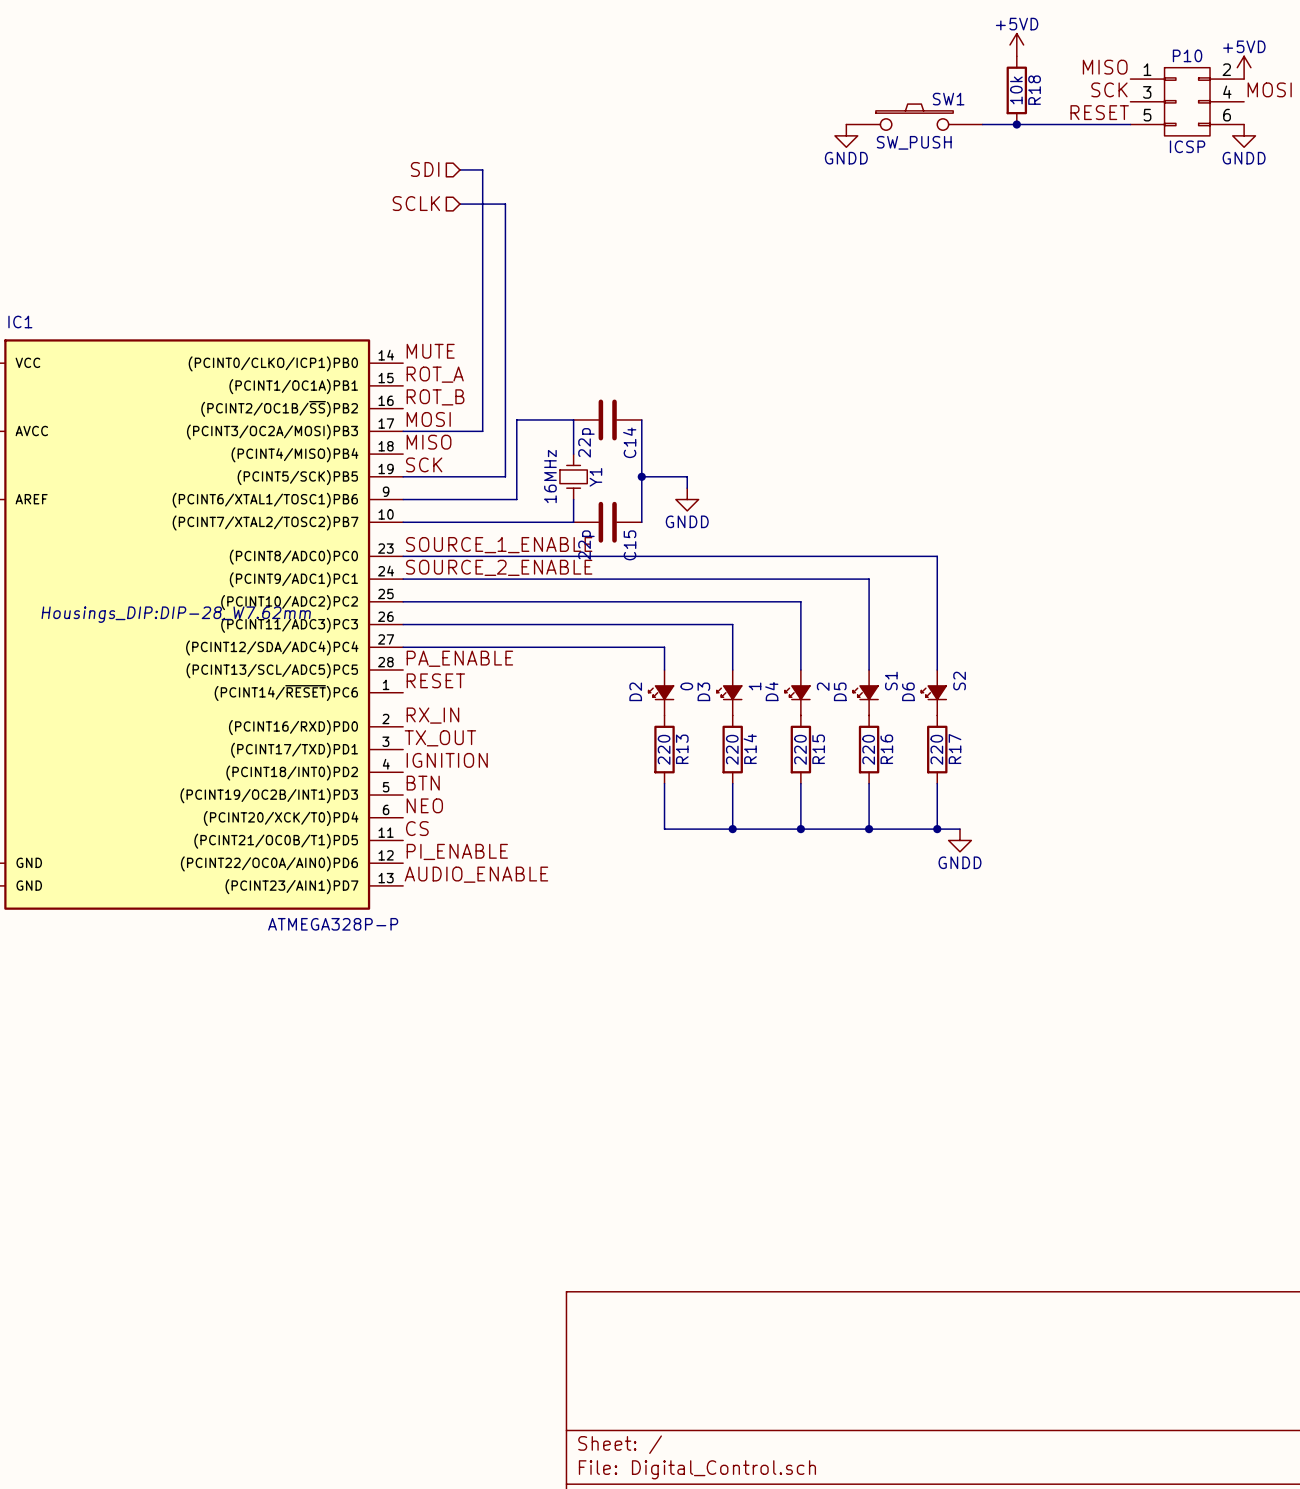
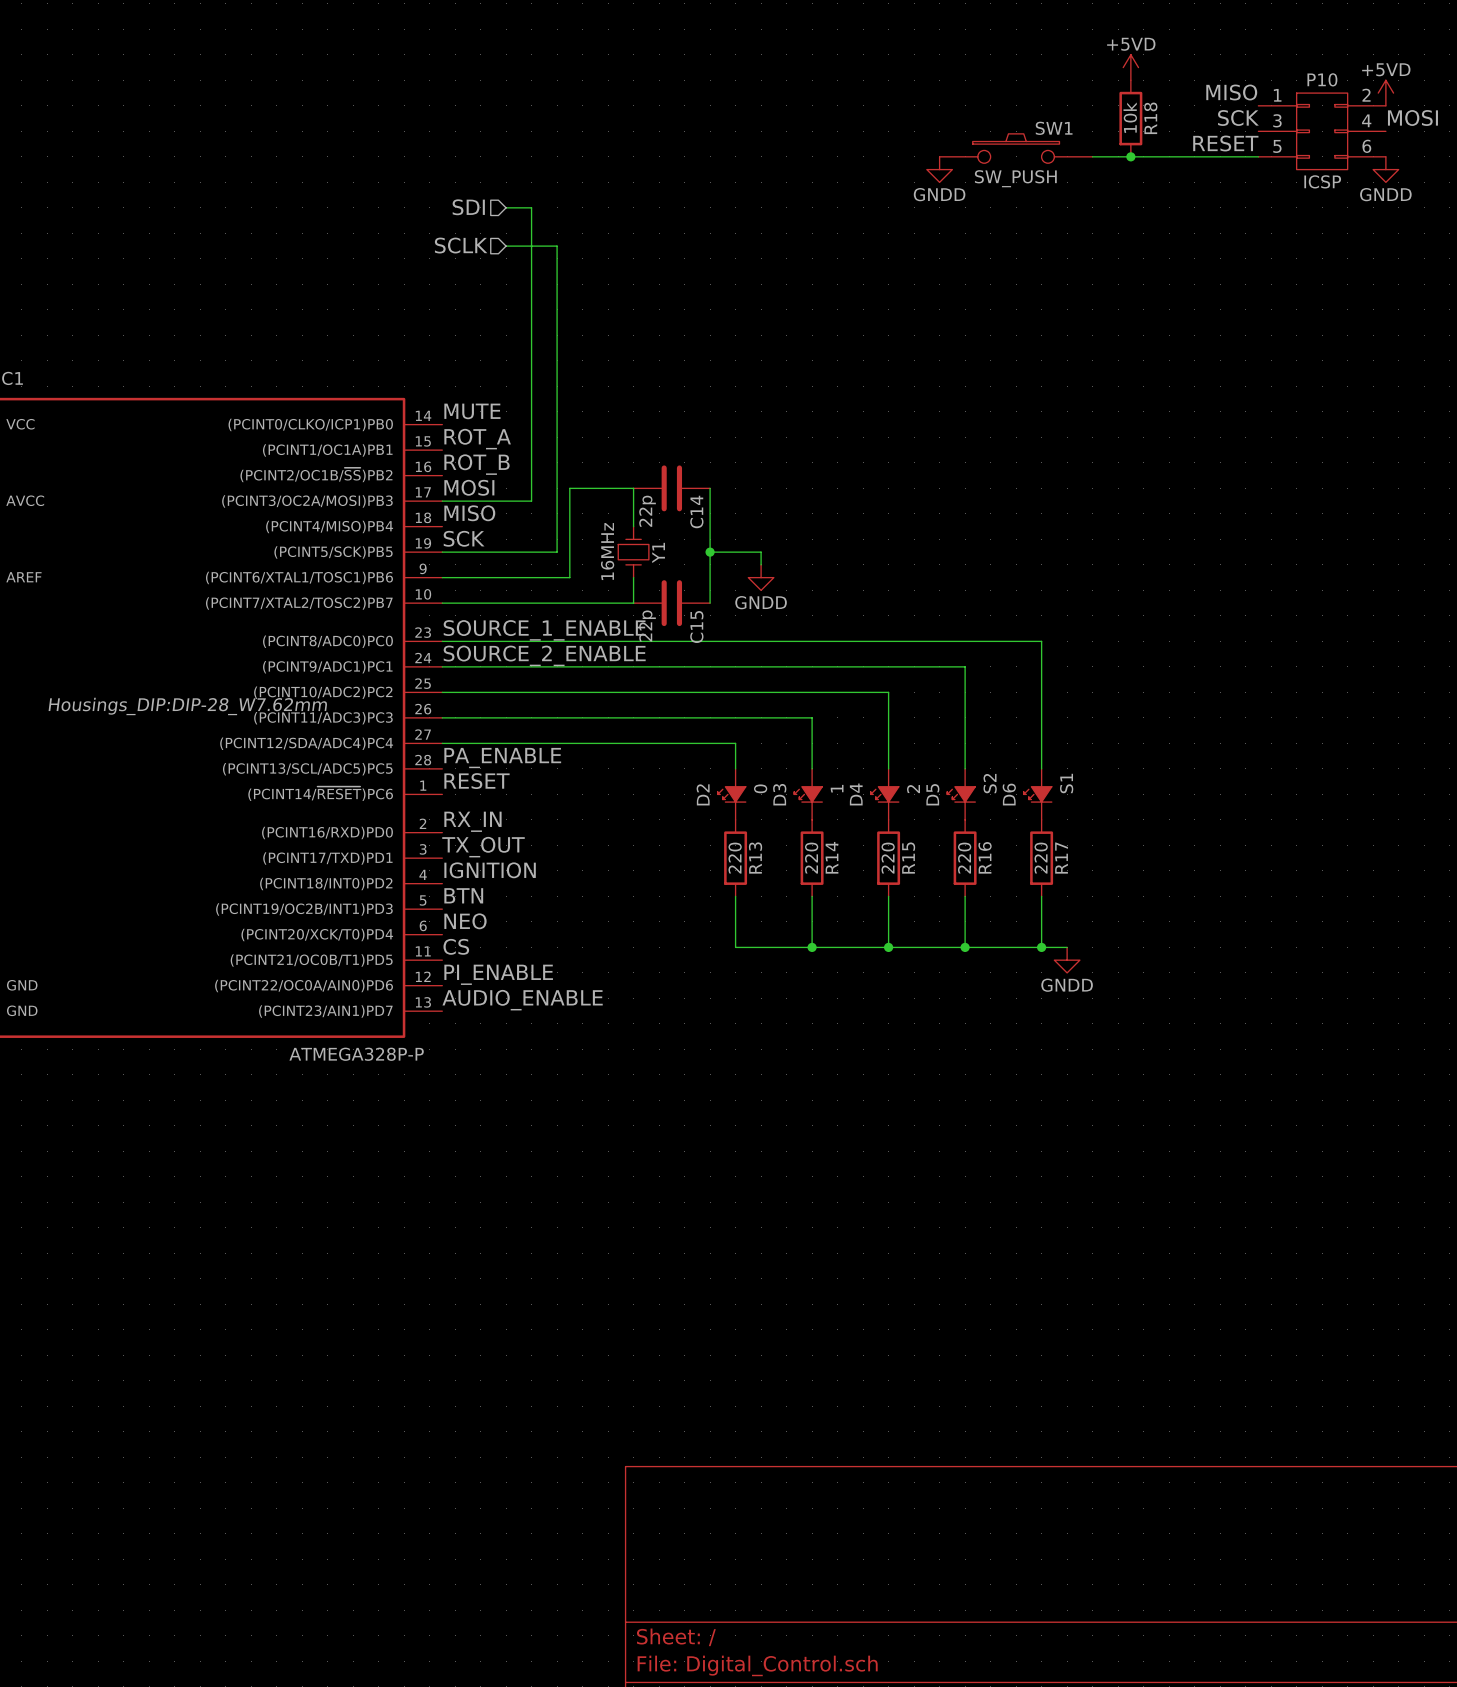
D5 value: S1 (891, 681) -> S2 (990, 783)
D6 value: S2 (959, 681) -> S1 (1066, 783)

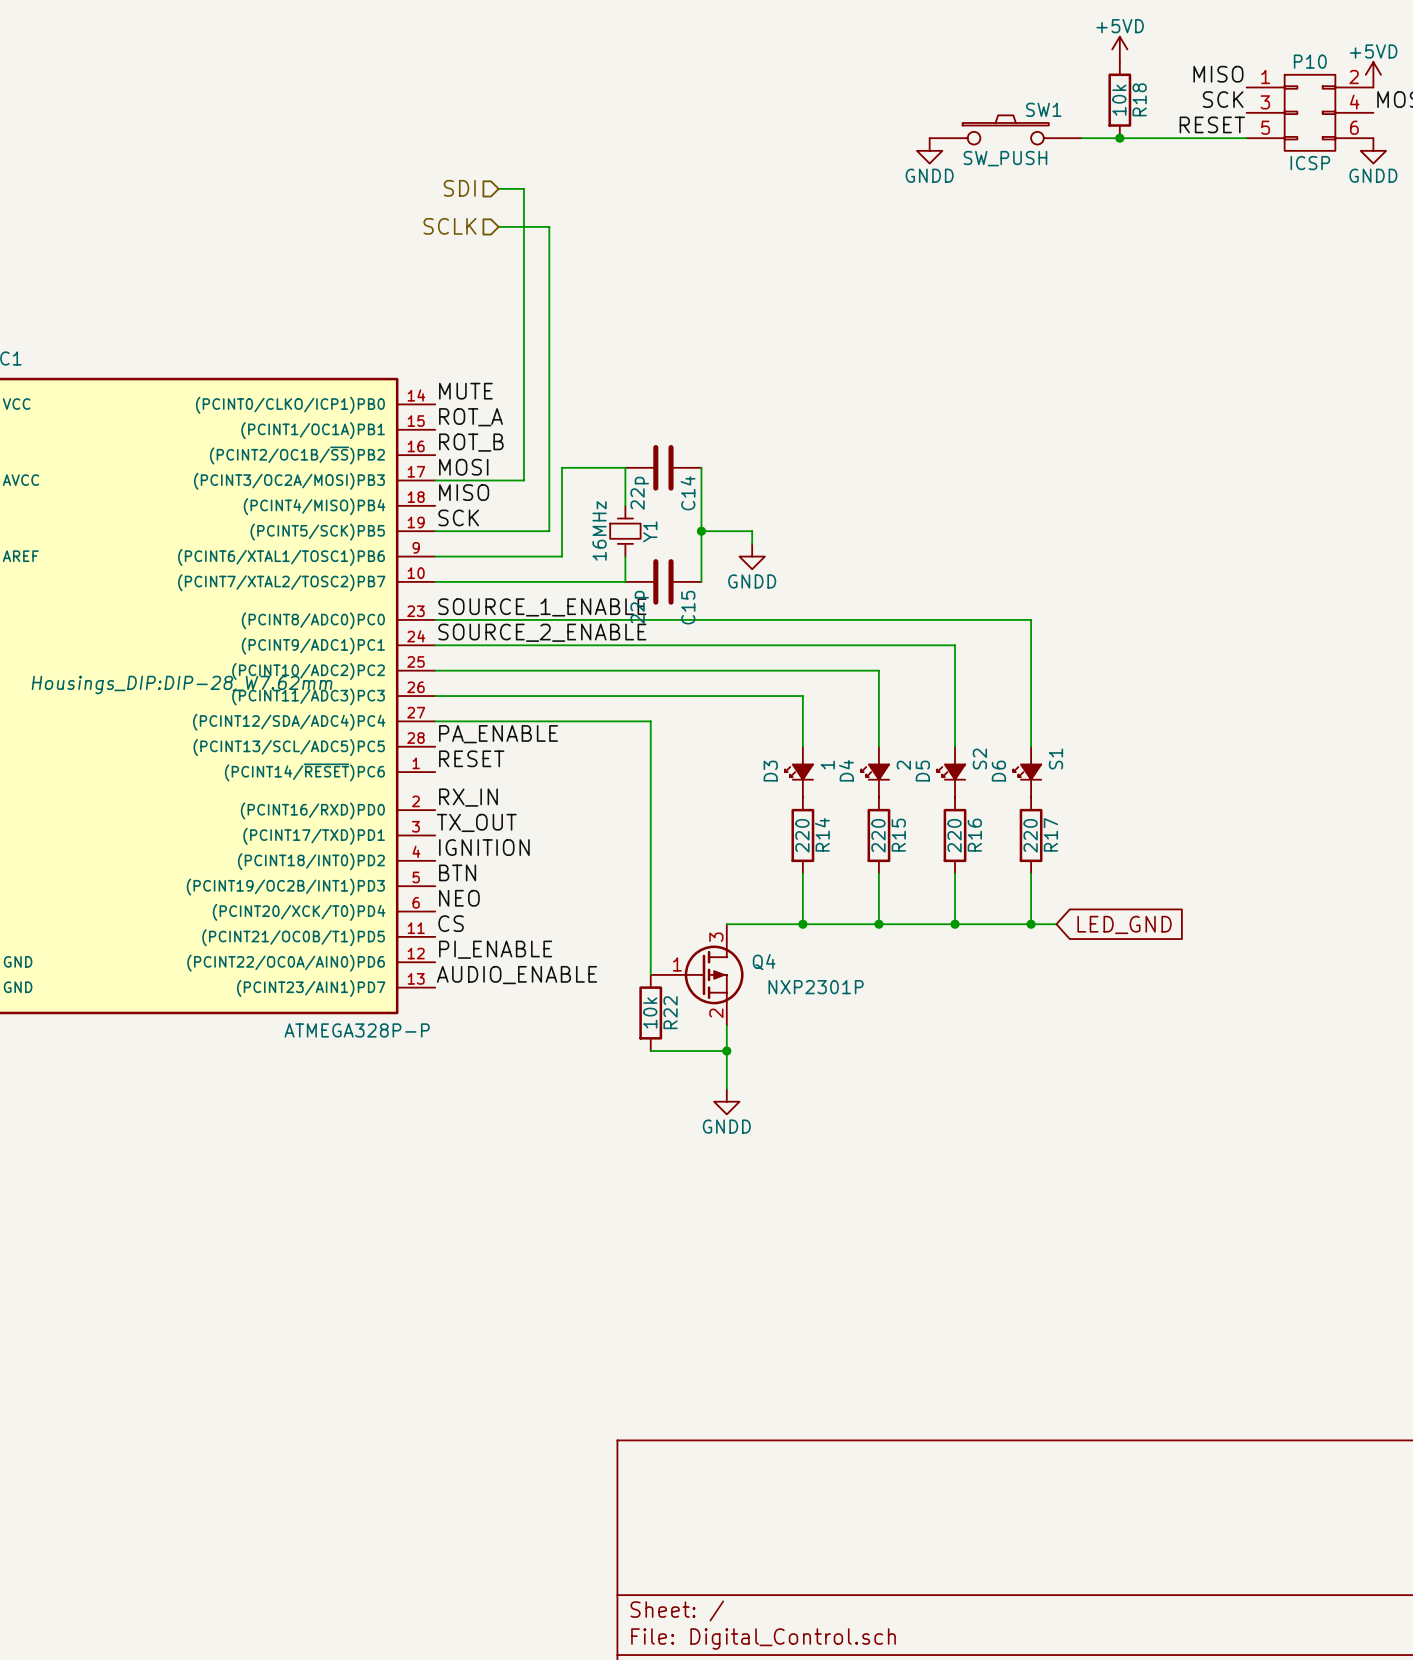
wire: (659, 743) (735, 743) (735, 768) -> (650, 721) (650, 974)
D2: 0 (731, 794) -> none
R13: 220 (735, 858) -> none
wire: (735, 896) (735, 947) -> none
global label: none -> LED_GND (1124, 924)
power symbol: GNDD (1067, 960) -> none
Q4: none -> NXP2301P (697, 974)
R22: none -> 10k (650, 1012)
wire: none -> (726, 1025) (726, 1089)
wire: none -> (650, 1051) (726, 1051)
junction: none -> (726, 1051)
power symbol: none -> GNDD (726, 1101)

